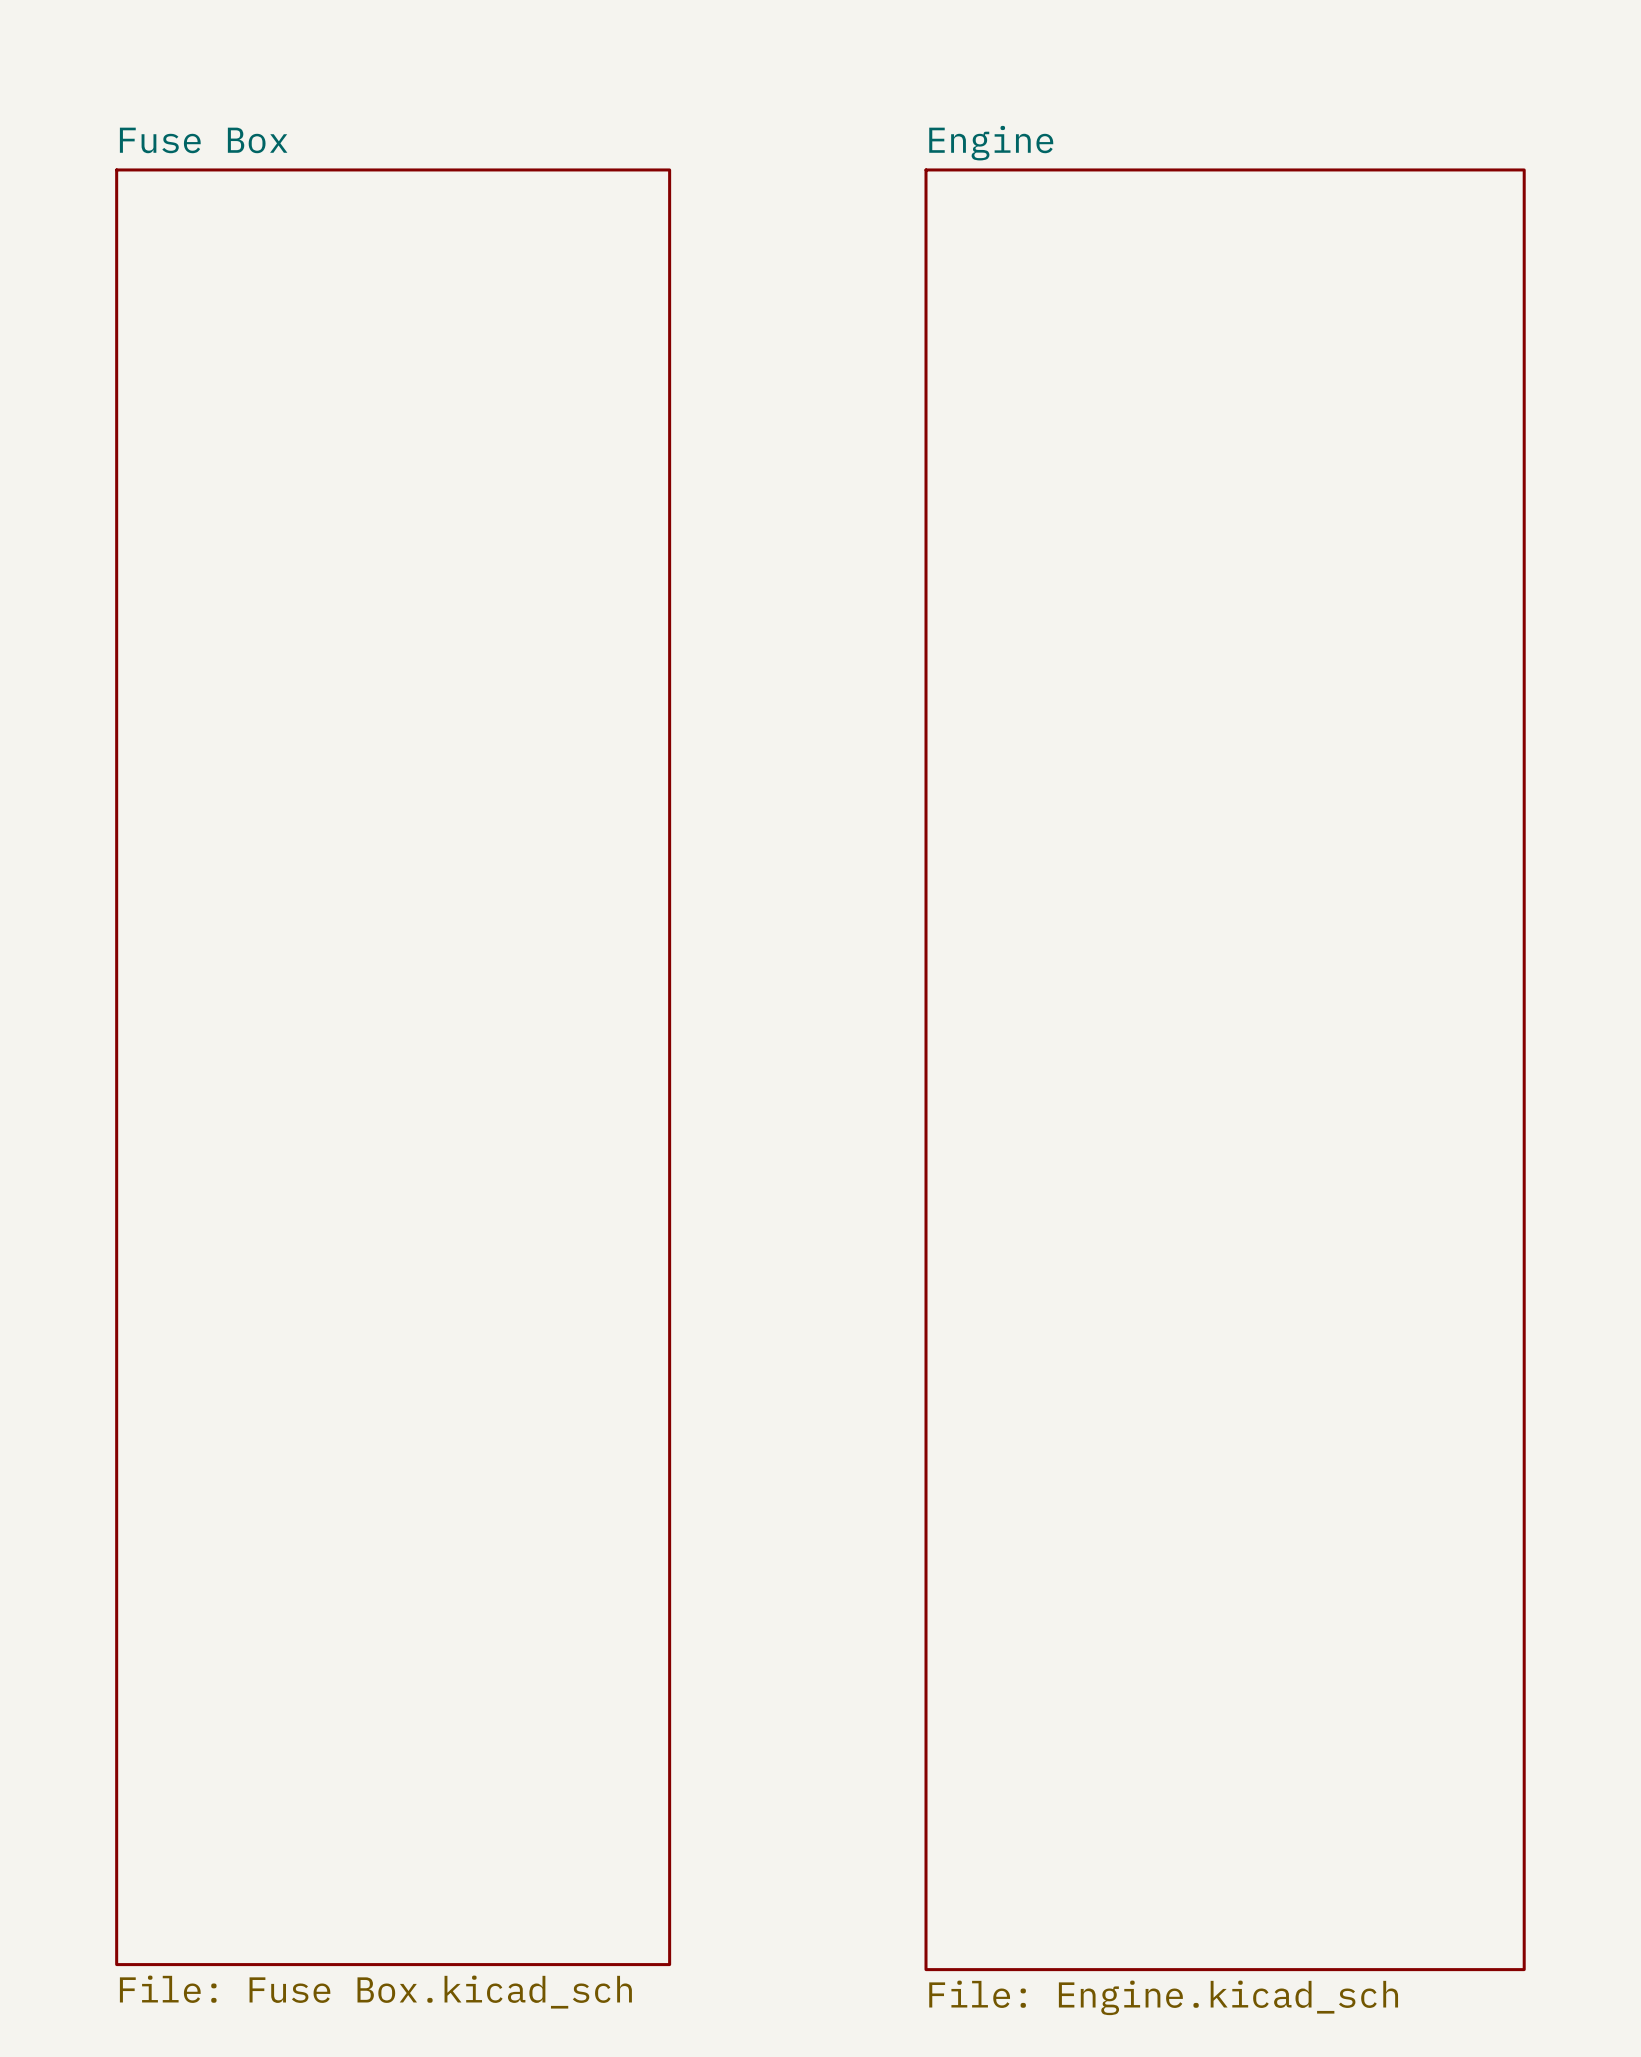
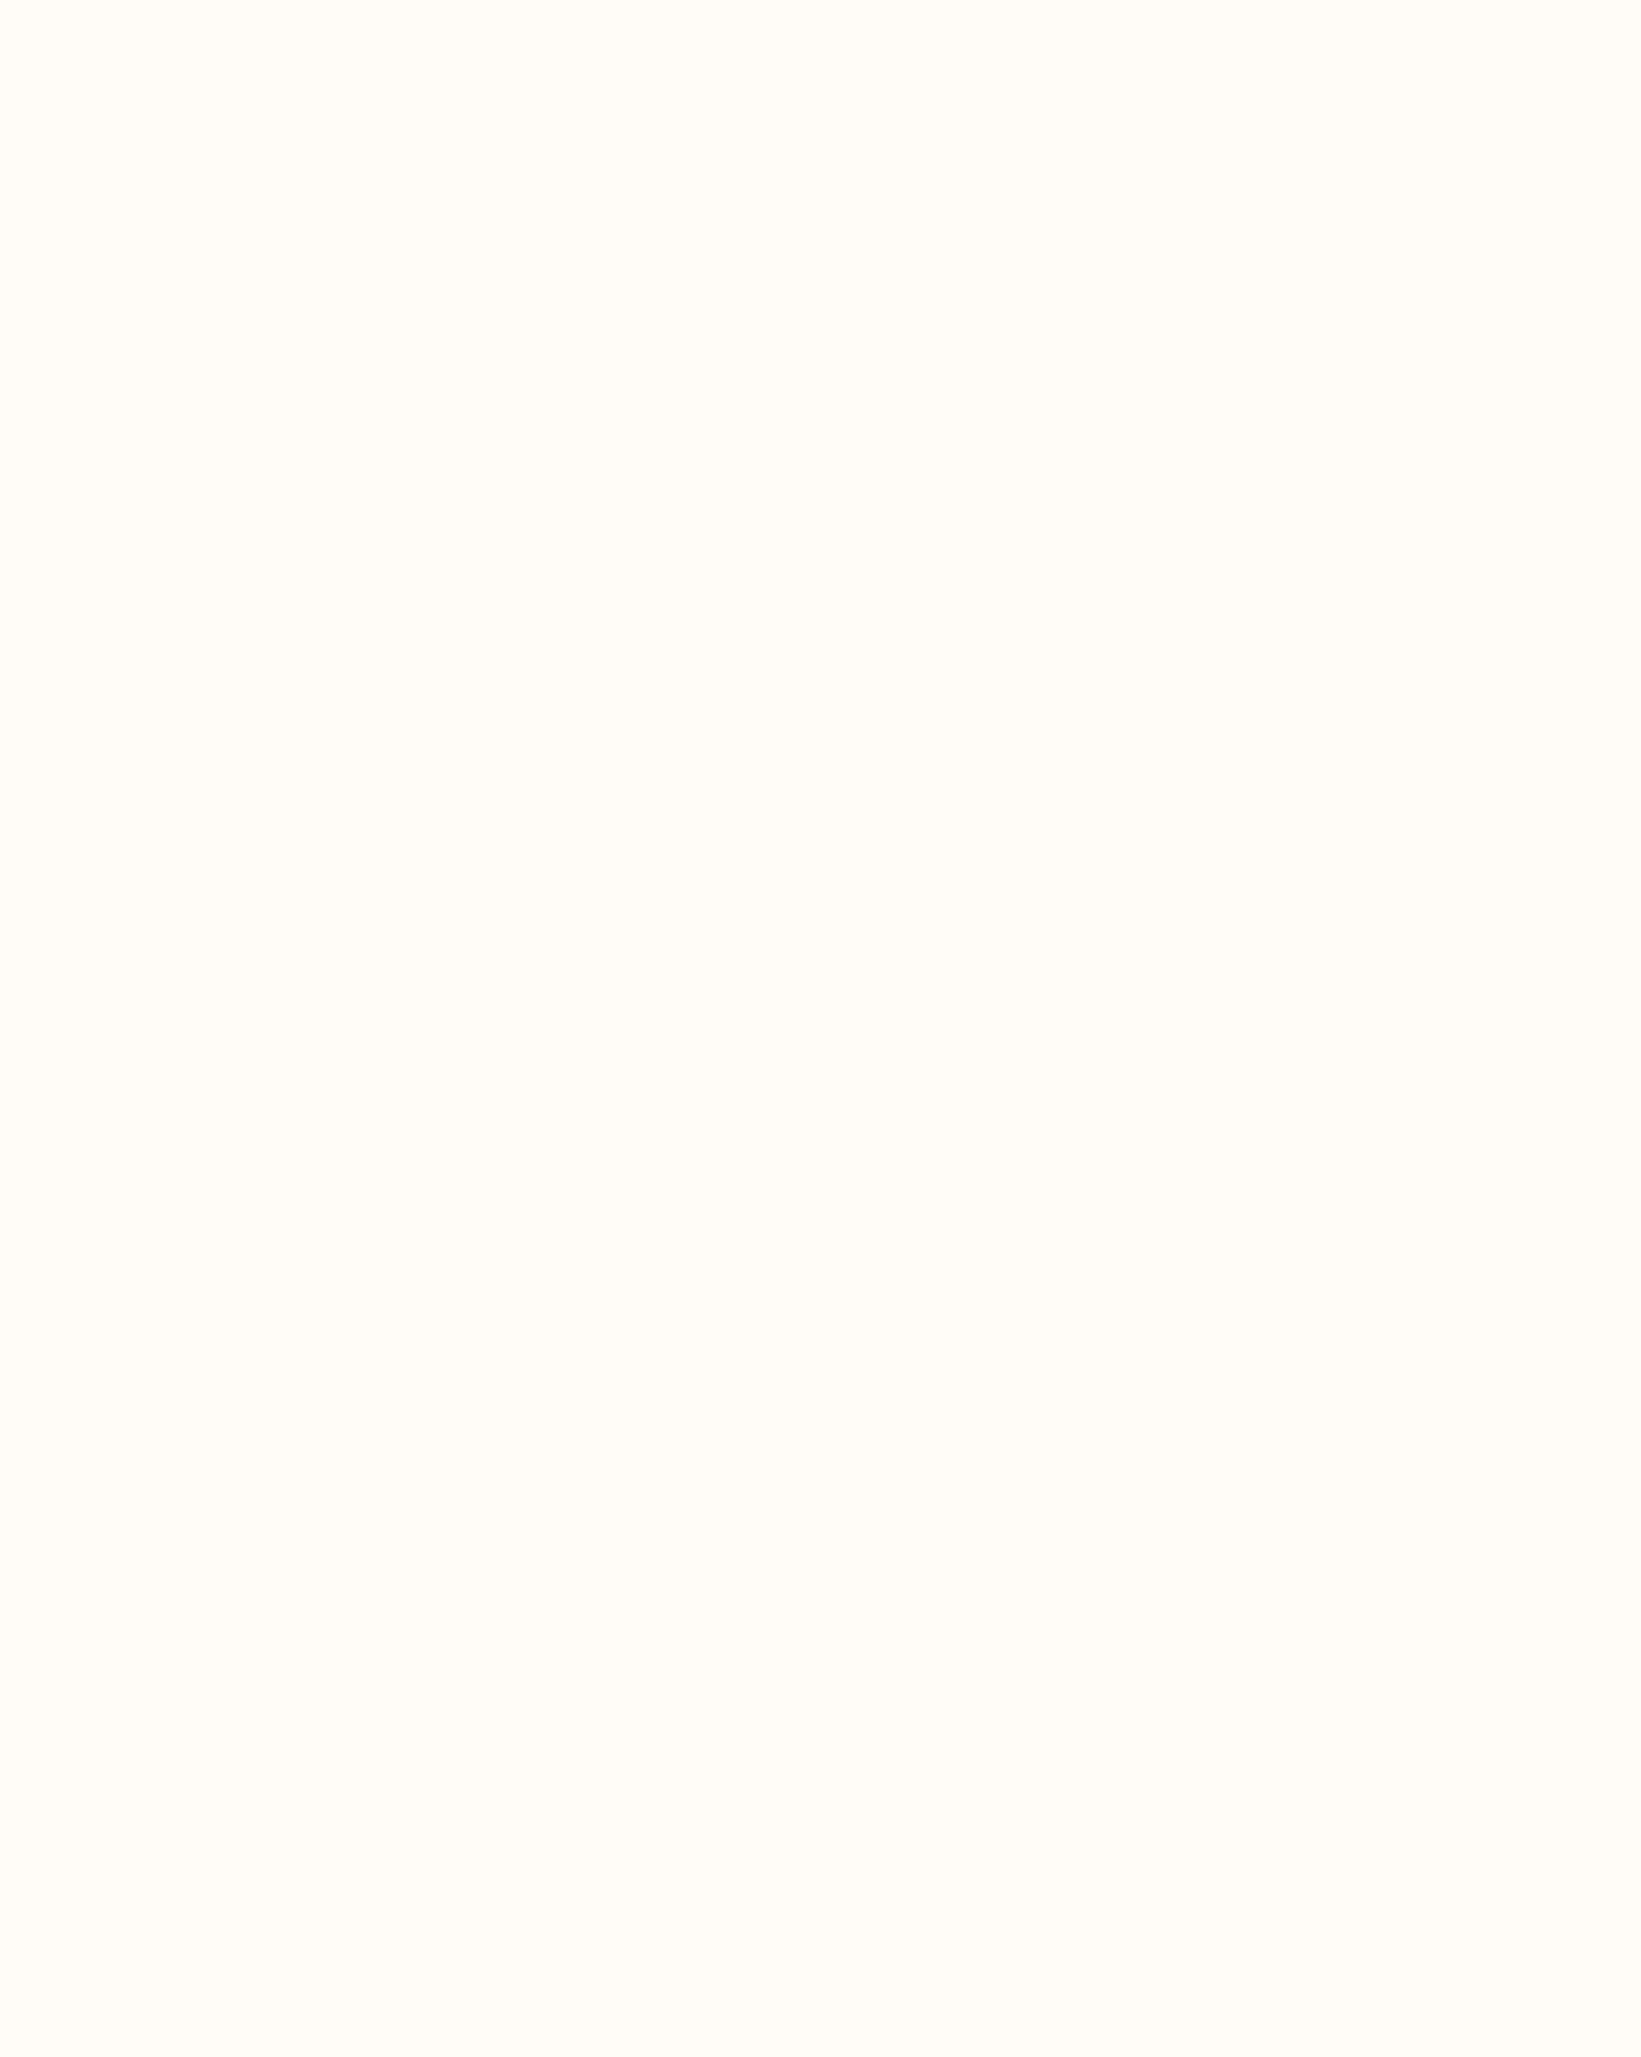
sheet Fuse Box: File: Fuse Box.kicad_sch (393, 1067) -> none
sheet Engine: File: Engine.kicad_sch (1225, 1069) -> none

